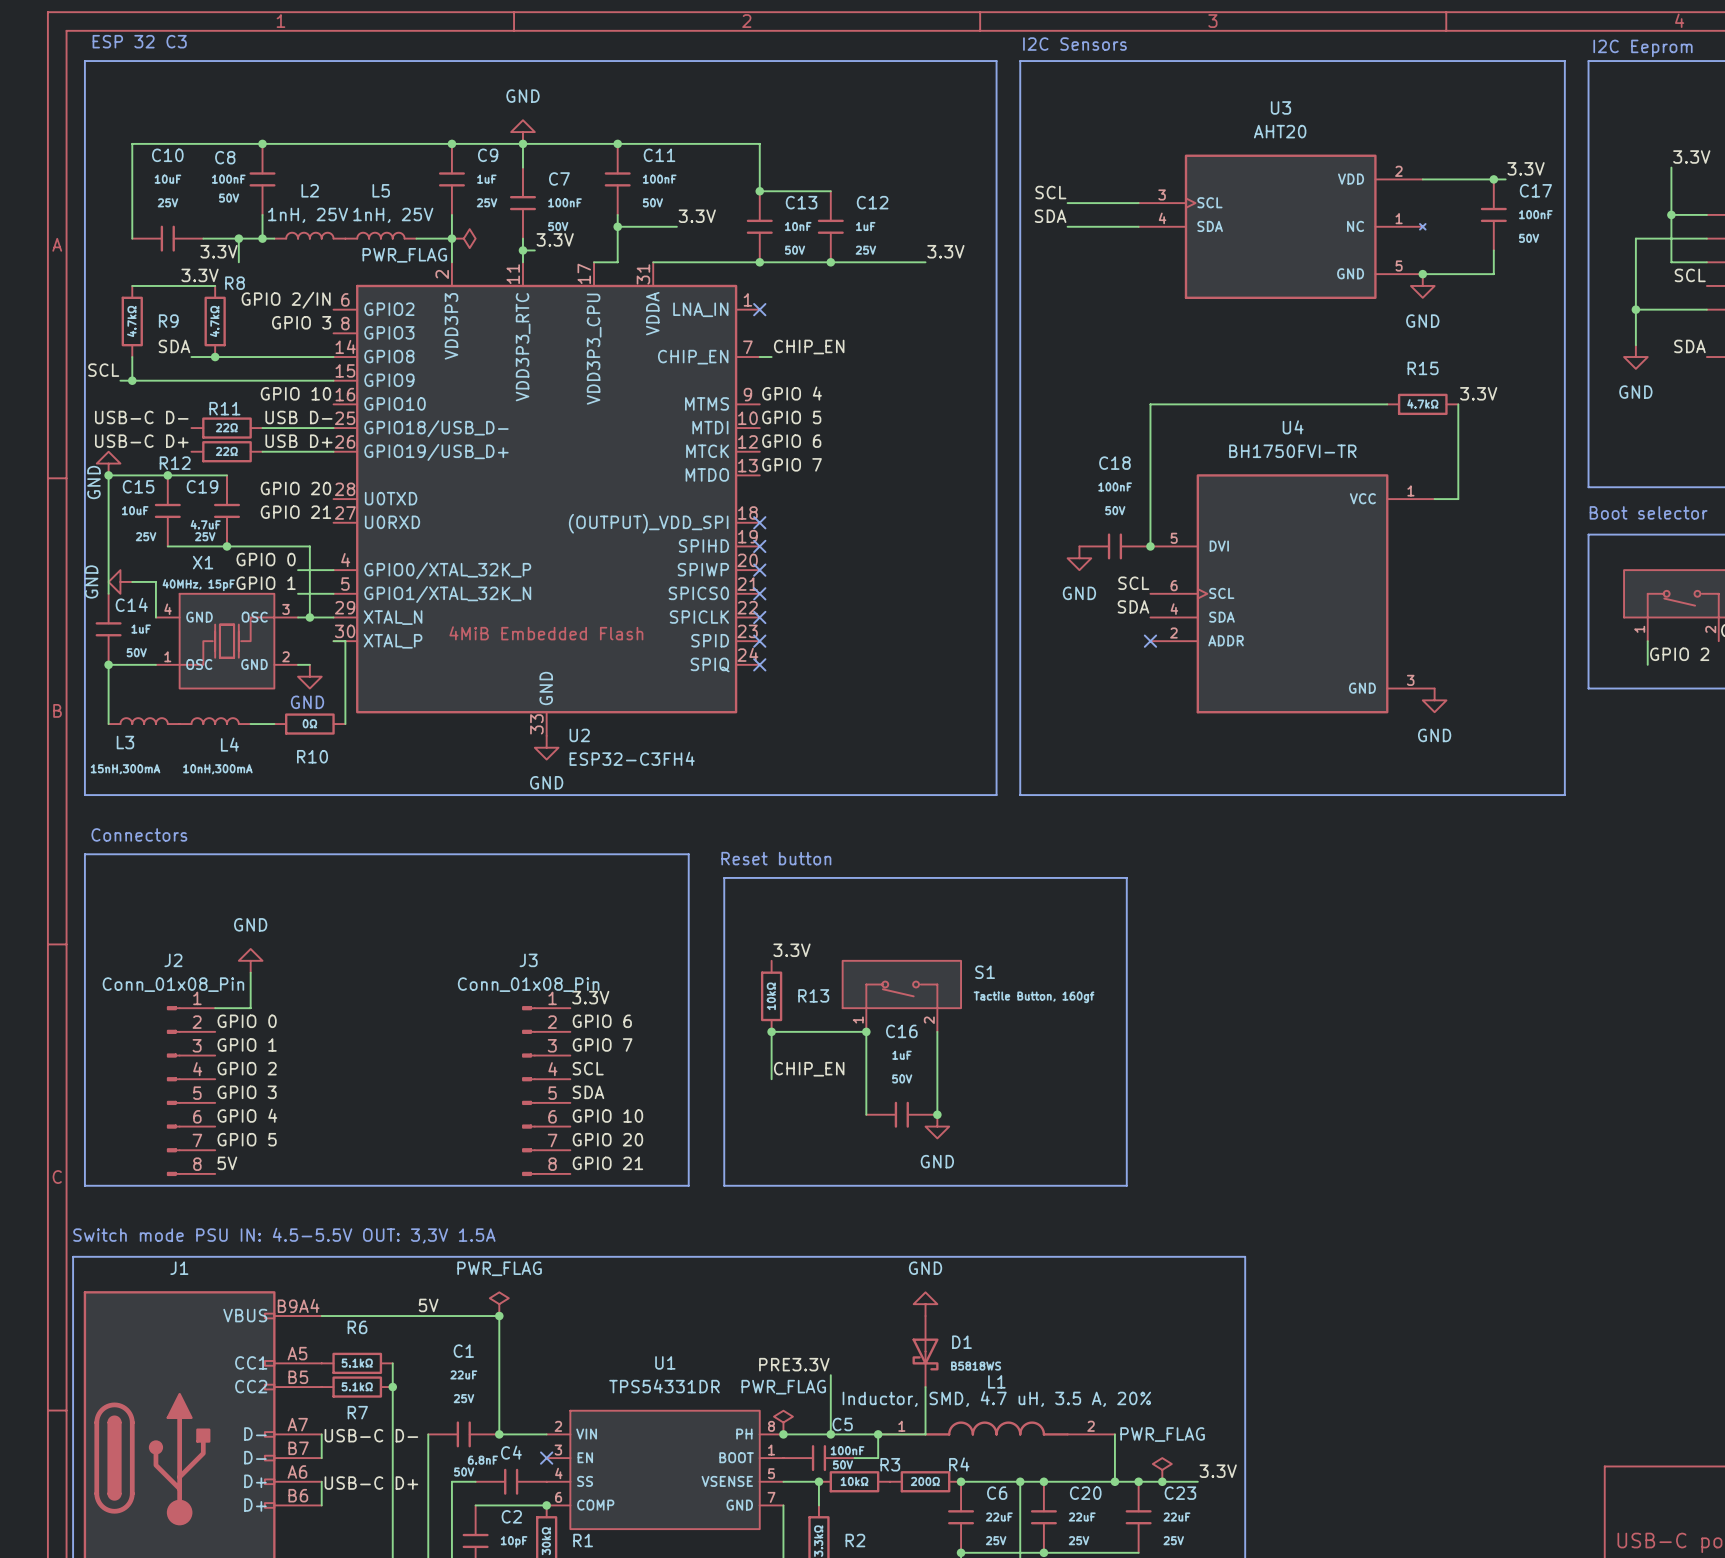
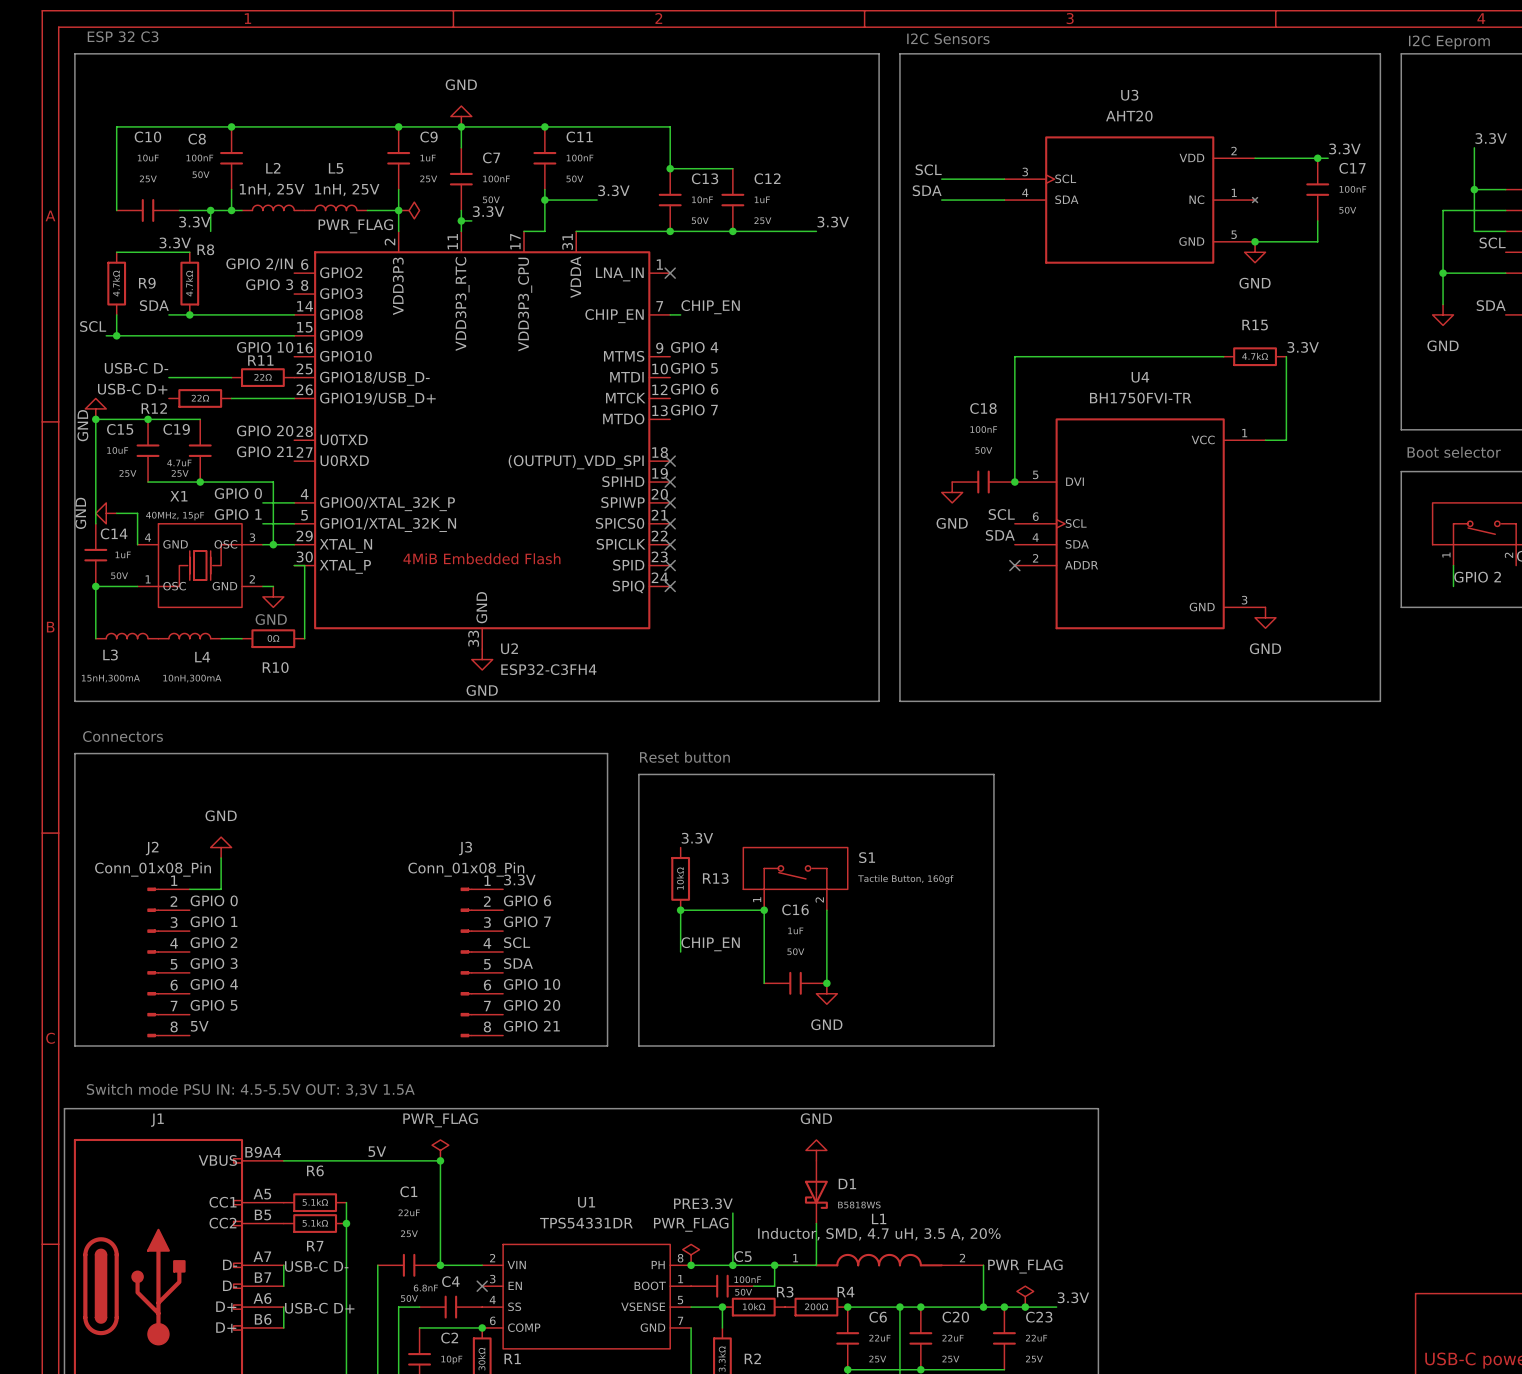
label: USB D- (298, 417) -> none
R11 position: (227, 428) -> (262, 377)
wire: (262, 428) (333, 428) -> (231, 377) (168, 377)
label: USB D+ (298, 441) -> none

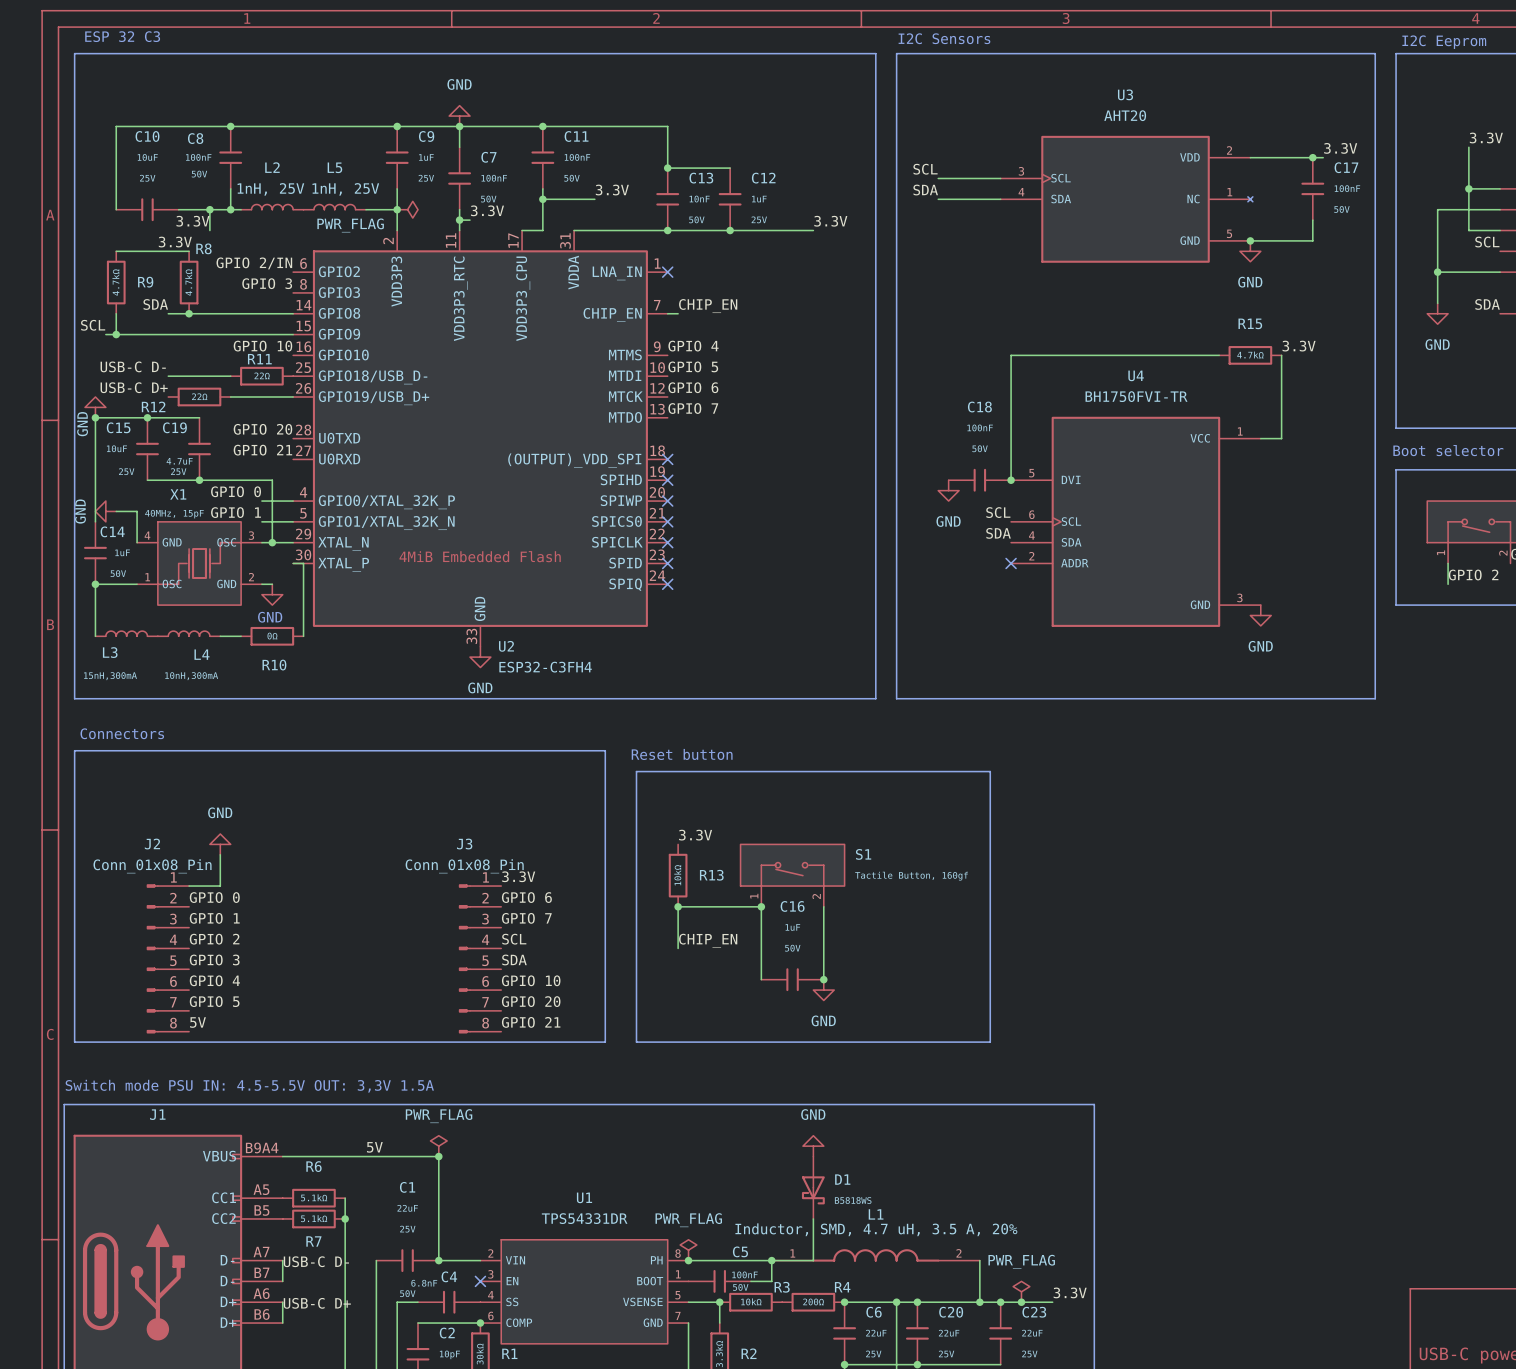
label: PRE3.3V (703, 1203) -> none
wire: (732, 1213) (732, 1265) -> none
junction: (732, 1265) -> none

